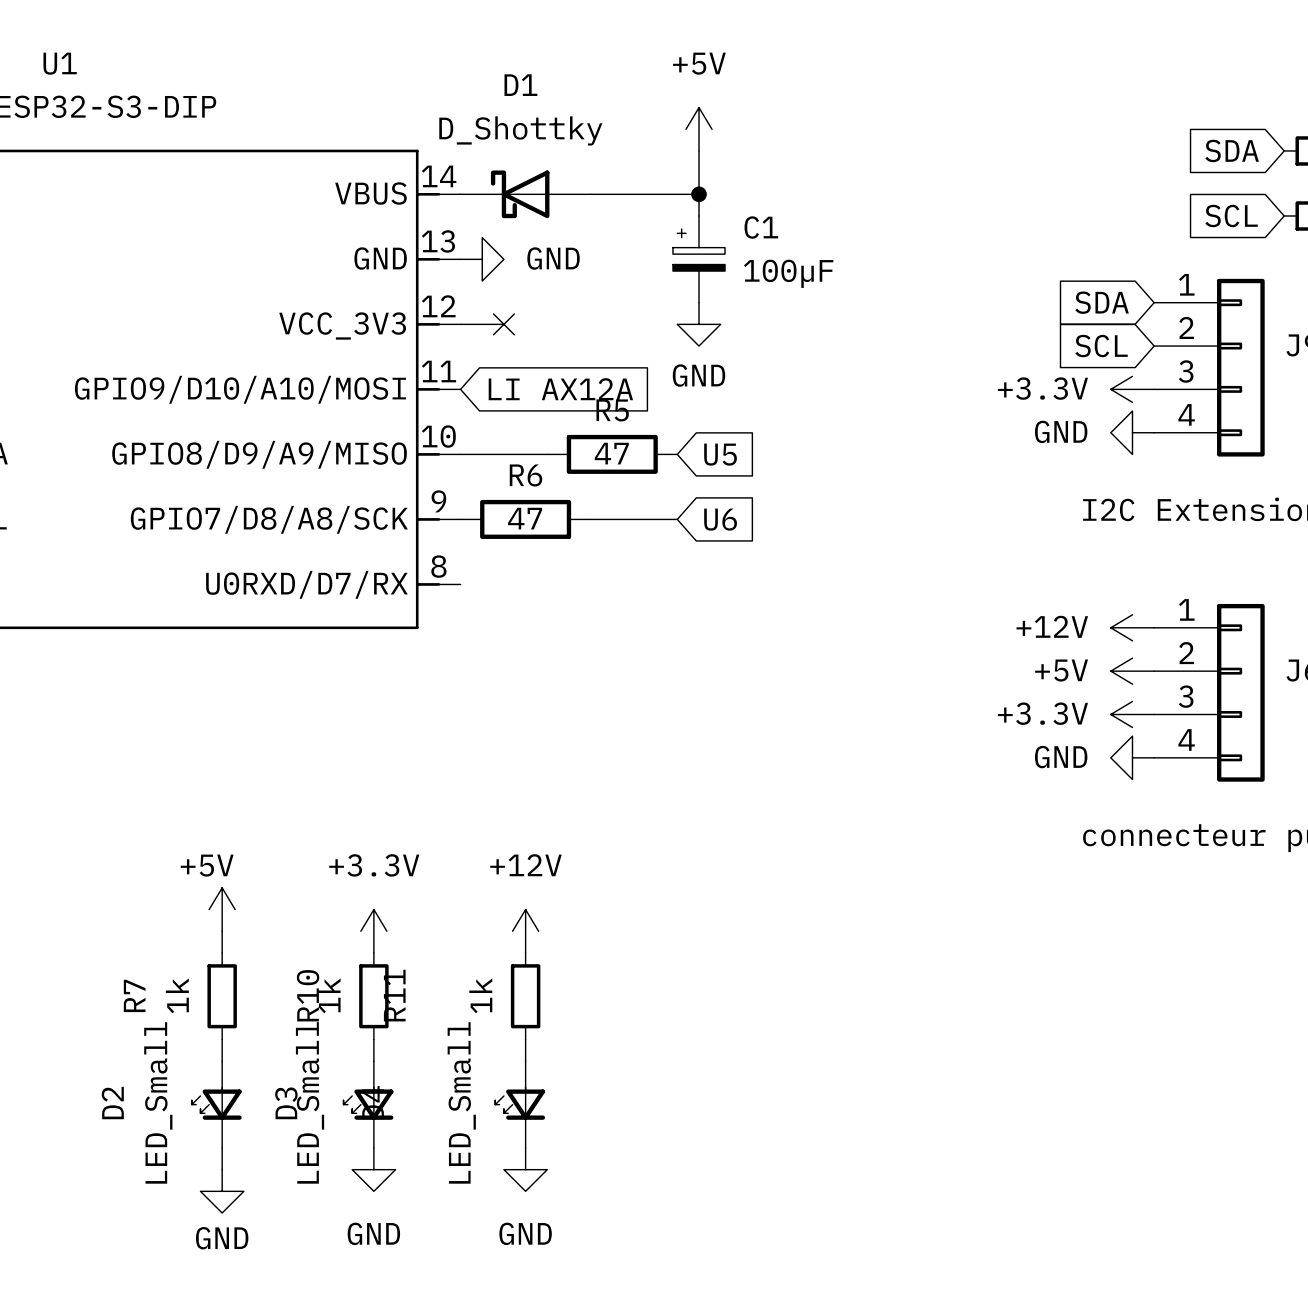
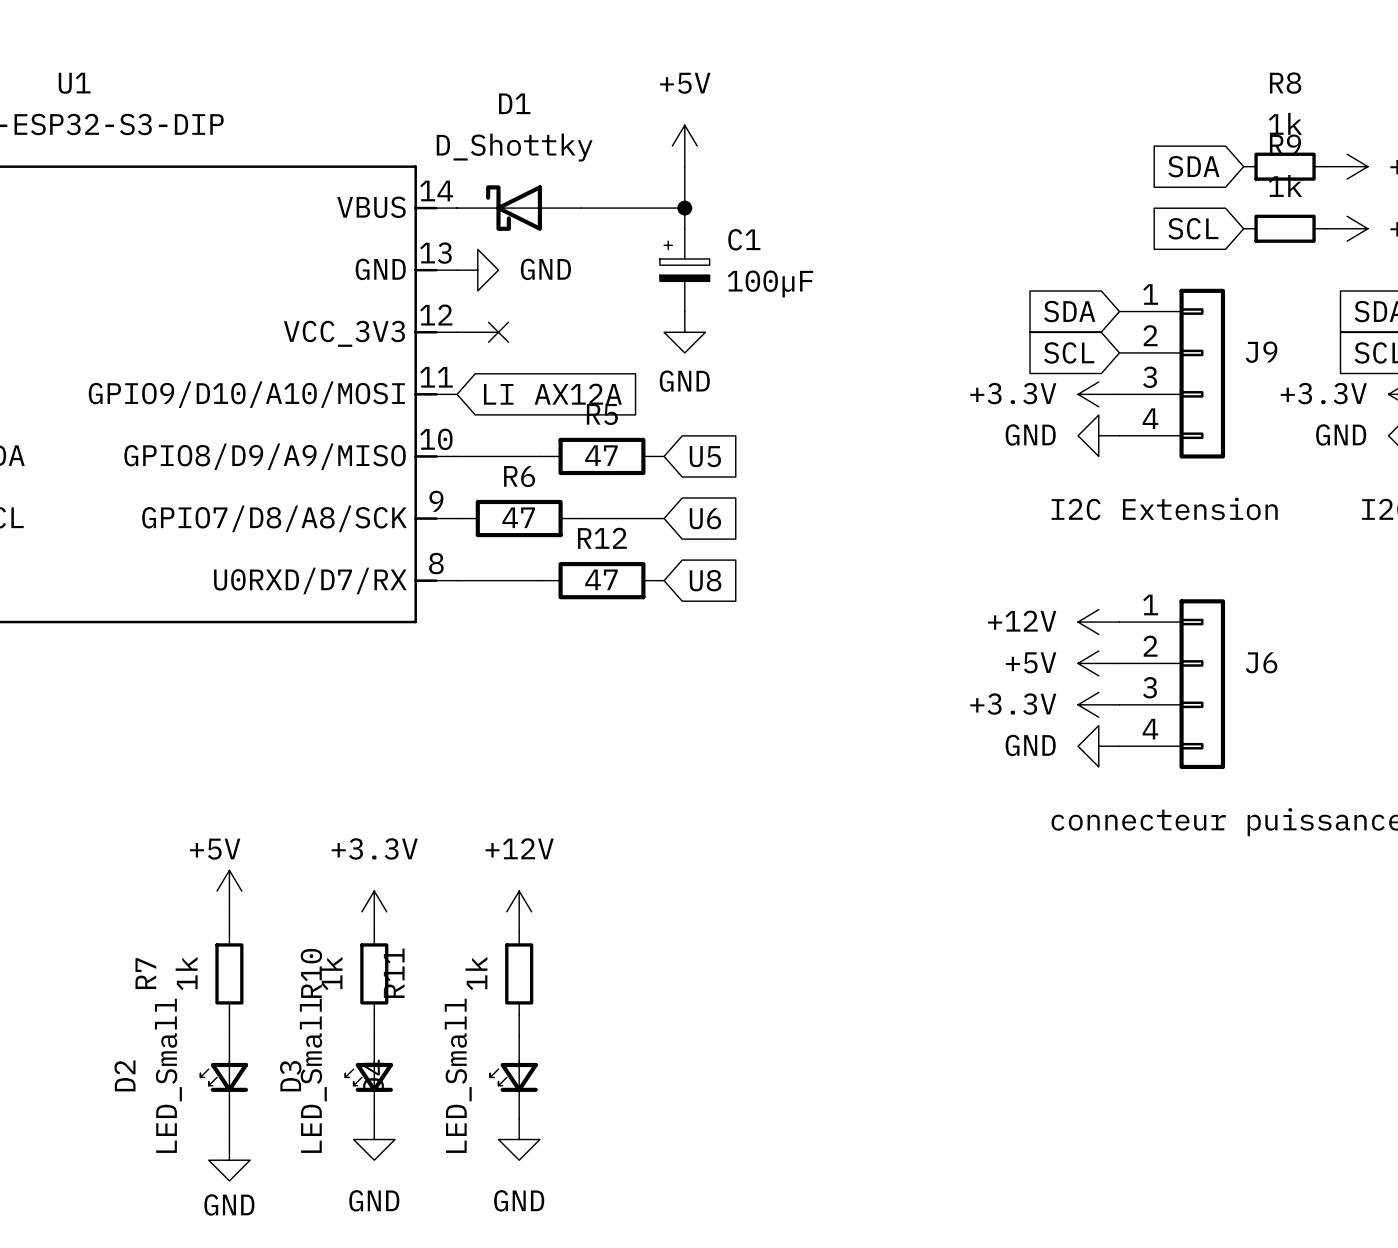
wire: none -> (457, 580) (539, 580)
R12: none -> 47 (601, 580)
global label: none -> U8 (705, 580)

